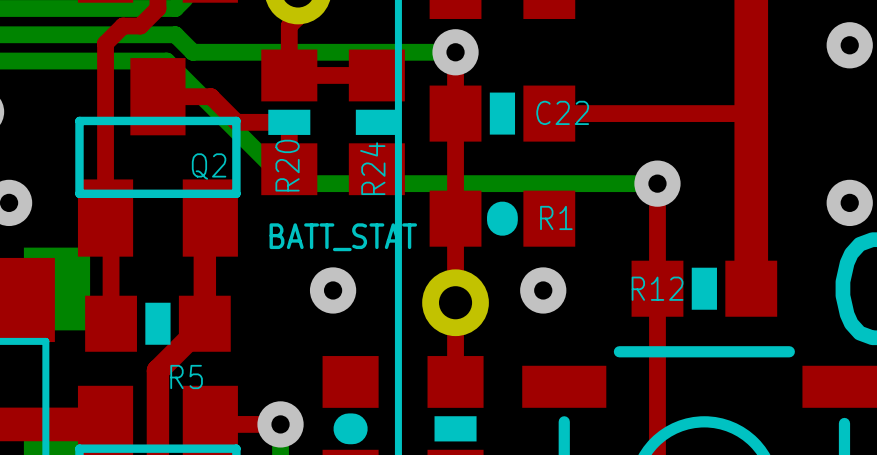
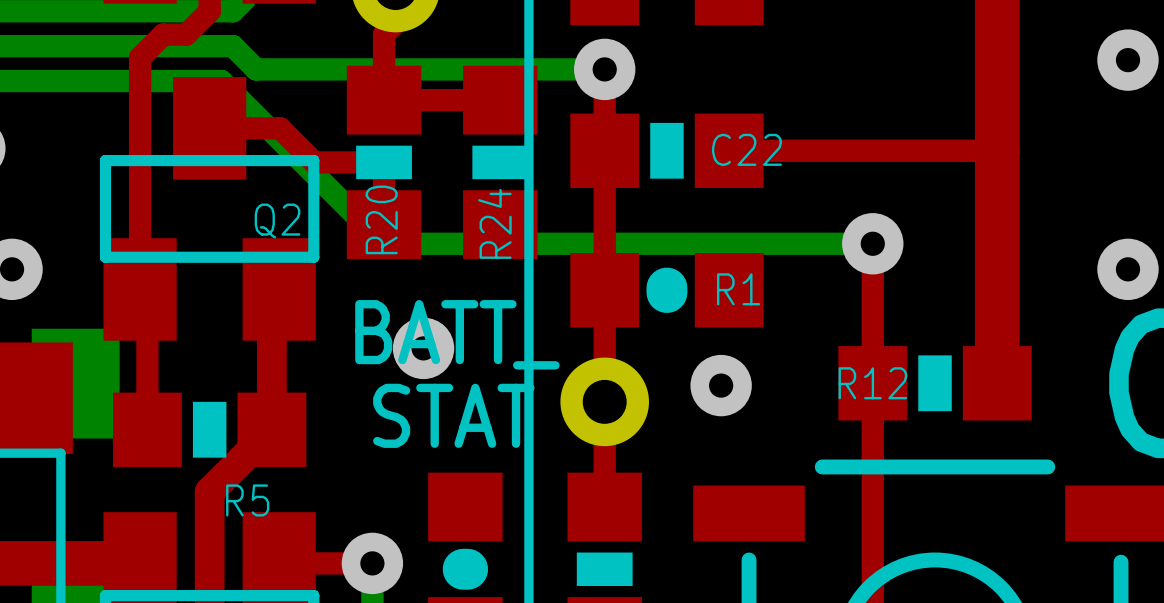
text: BATT_STAT (343, 237) -> BATT_ (457, 334)
via position: (333, 290) -> (423, 348)
text: none -> STAT (453, 415)

